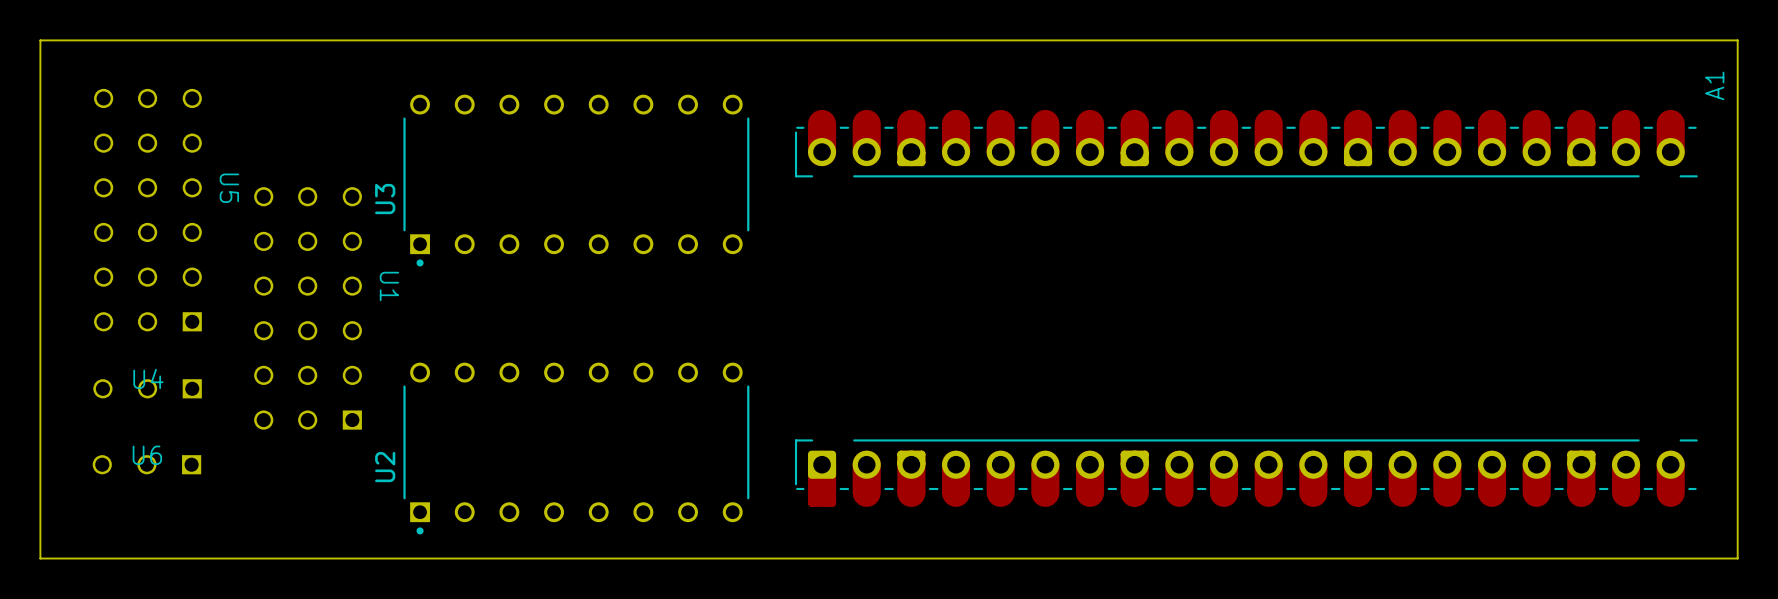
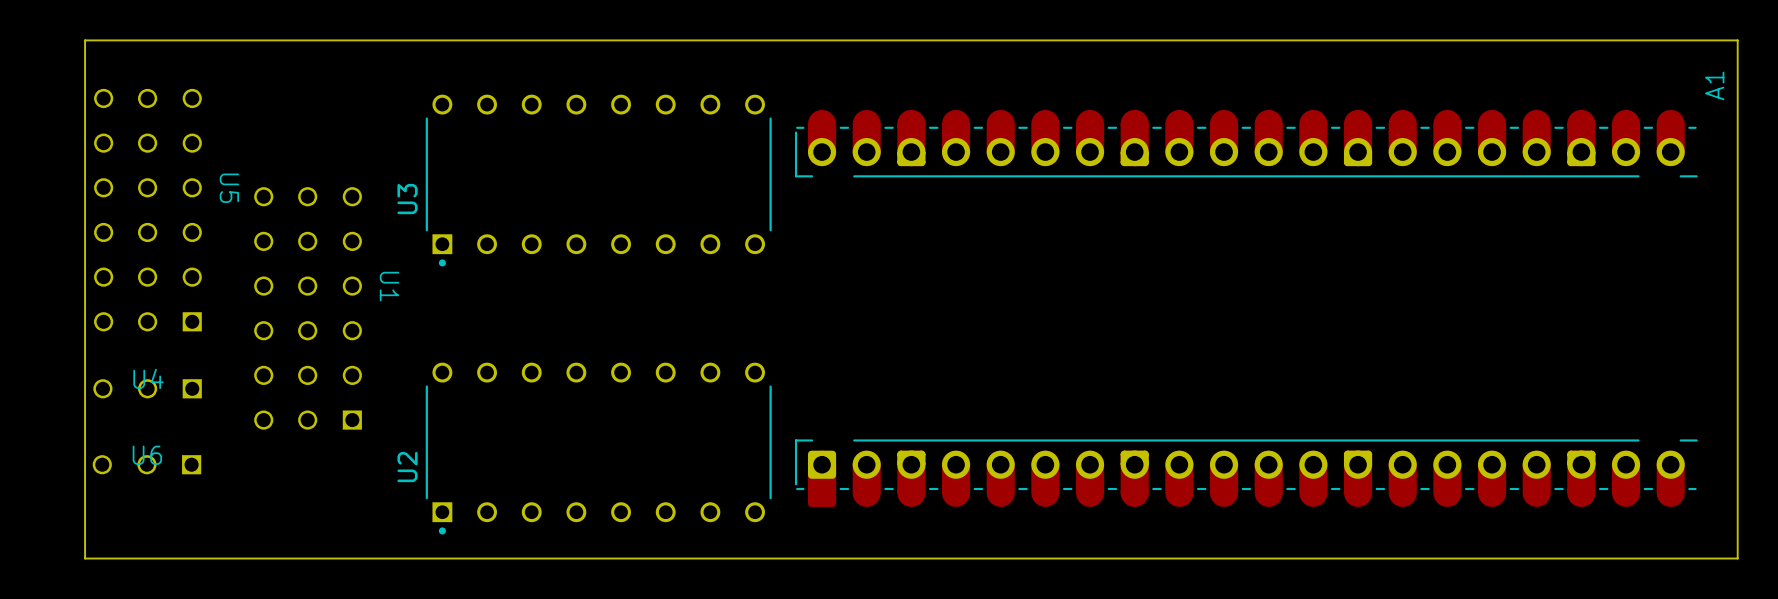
board edge: (85, 40) (40, 40) (40, 558) (85, 558) -> (85, 40) (85, 558)
U3 position: (576, 180) -> (598, 180)
U2 position: (576, 448) -> (598, 448)

